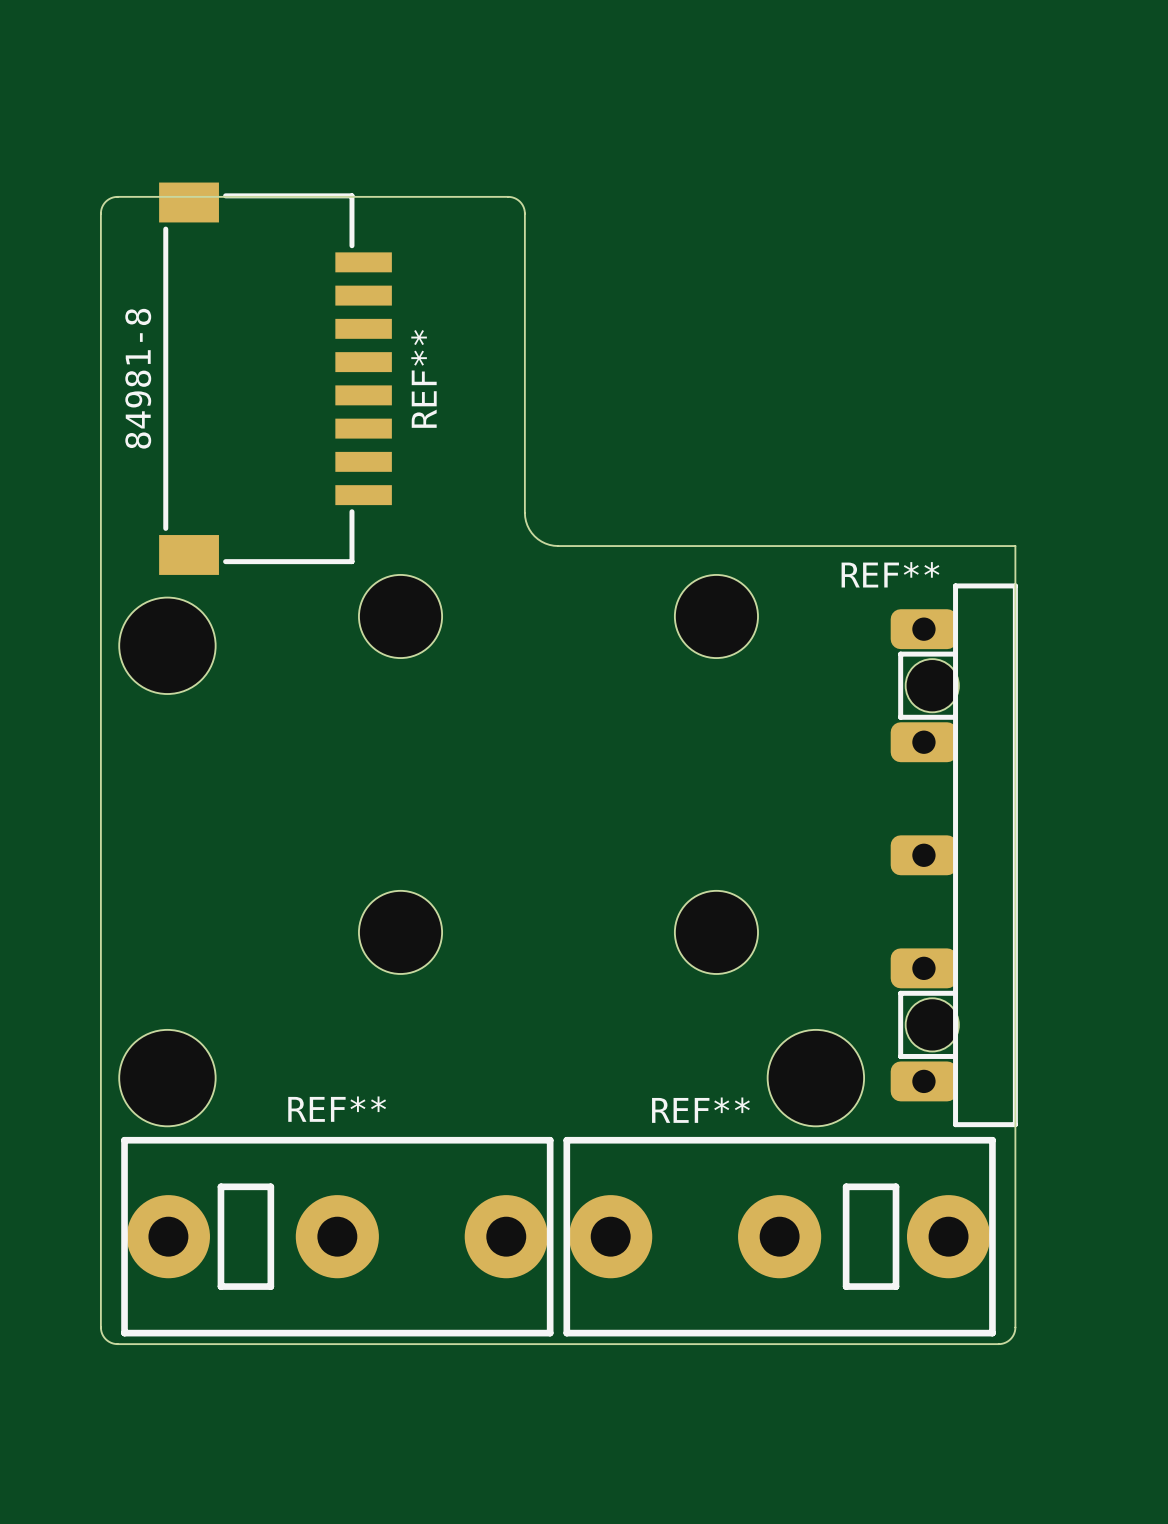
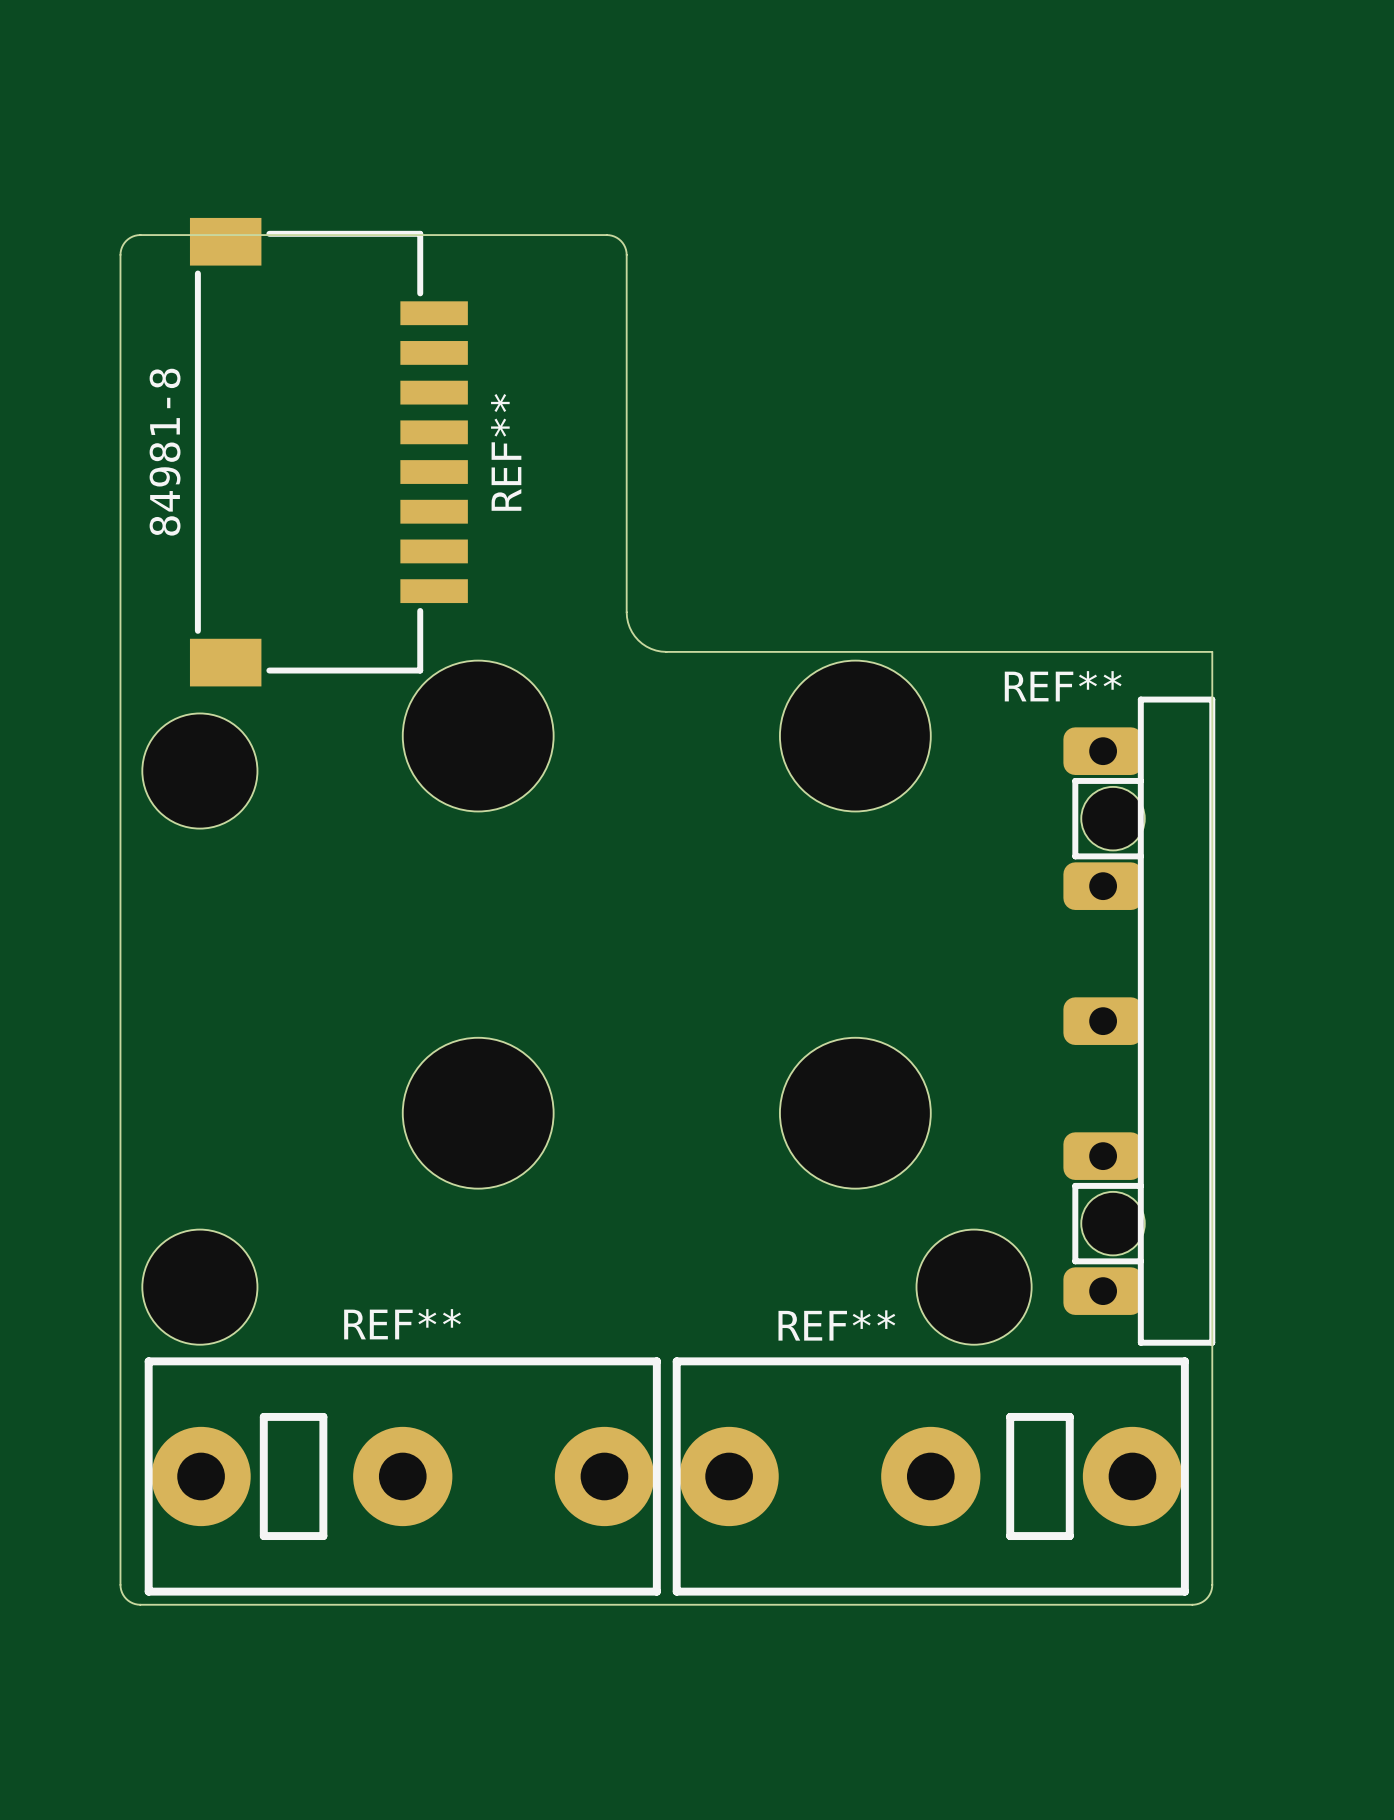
part footprint: [358, 574, 443, 659] -> [402, 660, 554, 812]
part footprint: [674, 574, 759, 659] -> [779, 660, 931, 812]
part footprint: [358, 890, 443, 974] -> [402, 1037, 554, 1189]
part footprint: [674, 890, 759, 974] -> [779, 1037, 931, 1189]

